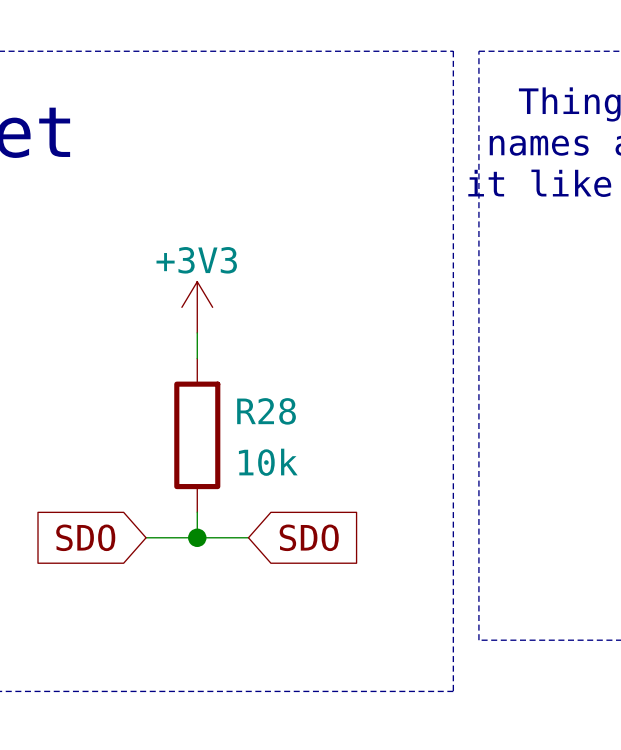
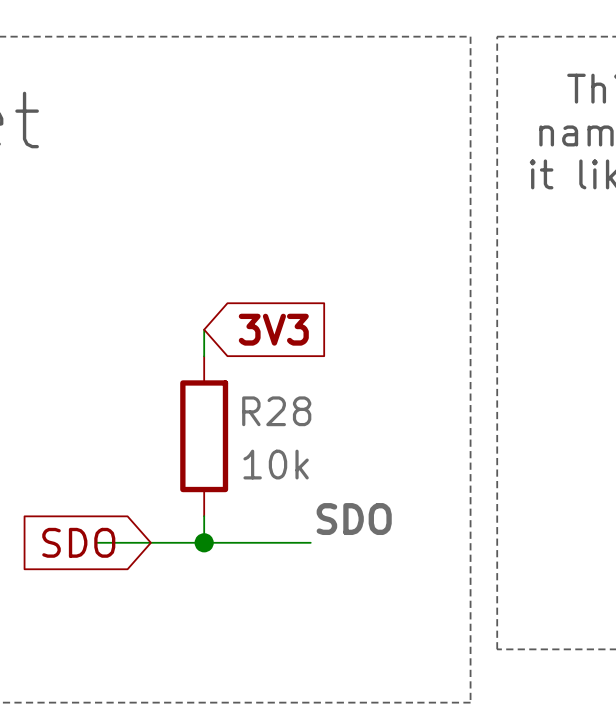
power symbol: +3V3 (197, 307) -> none
global label: none -> 3V3 (273, 329)
label: none -> SDO (354, 519)
wire: none -> (97, 542) (150, 542)
wire: none -> (257, 542) (310, 542)
global label: SDO (309, 537) -> none

